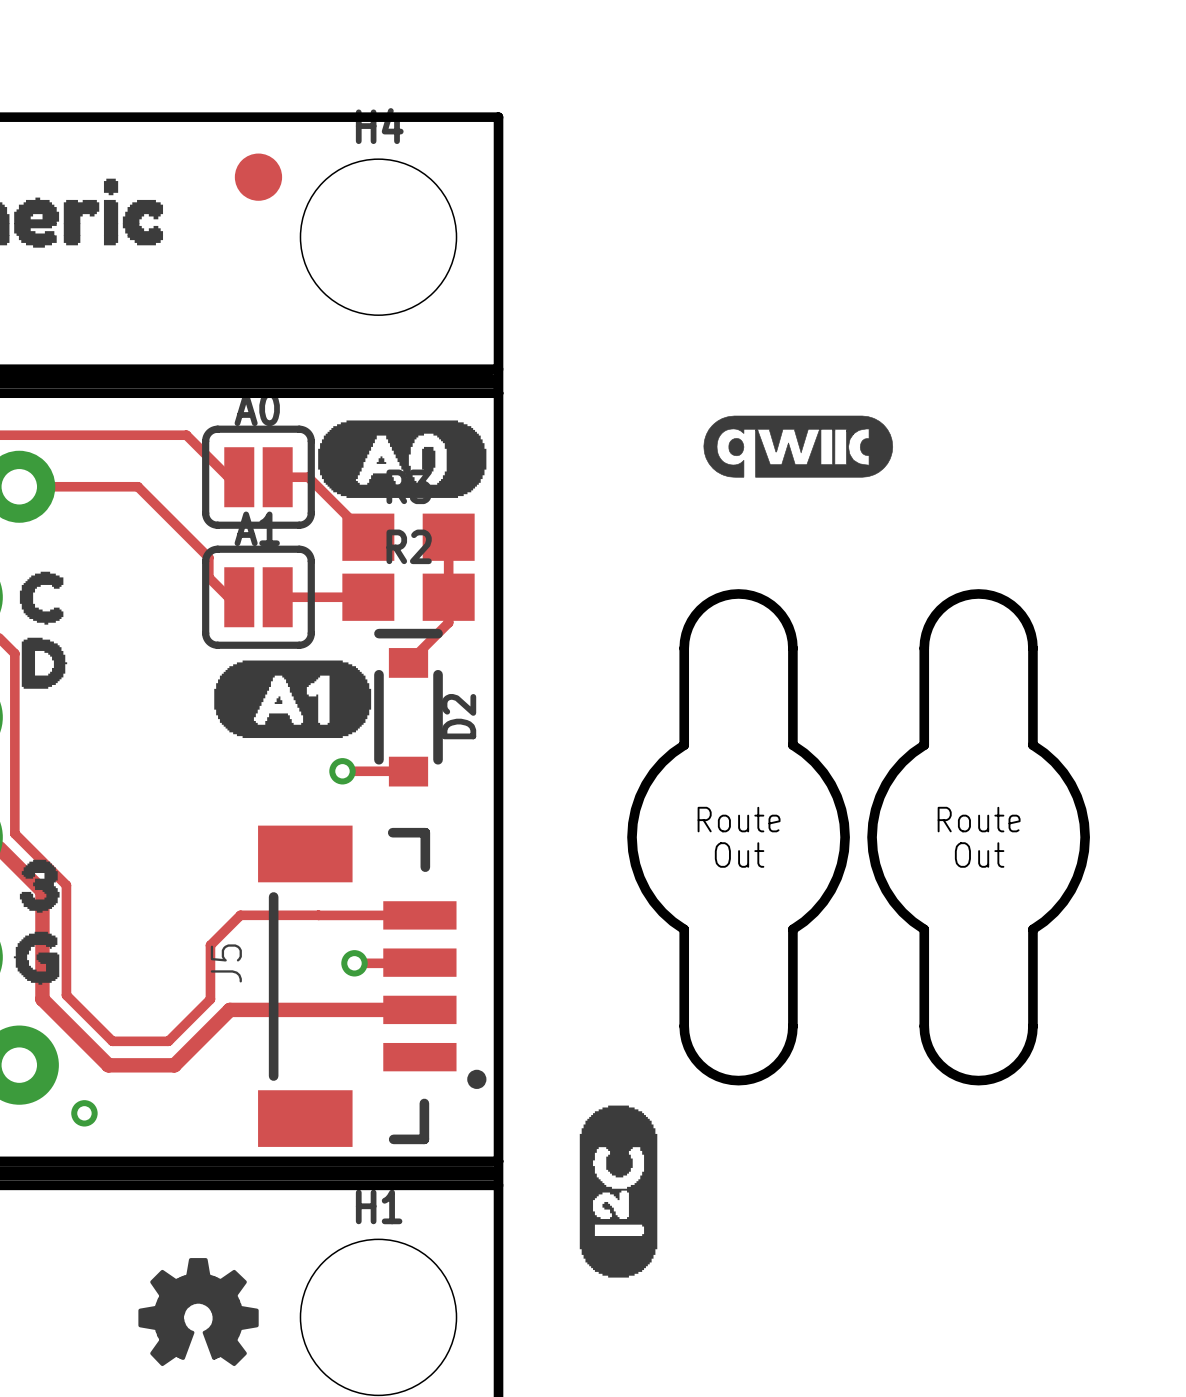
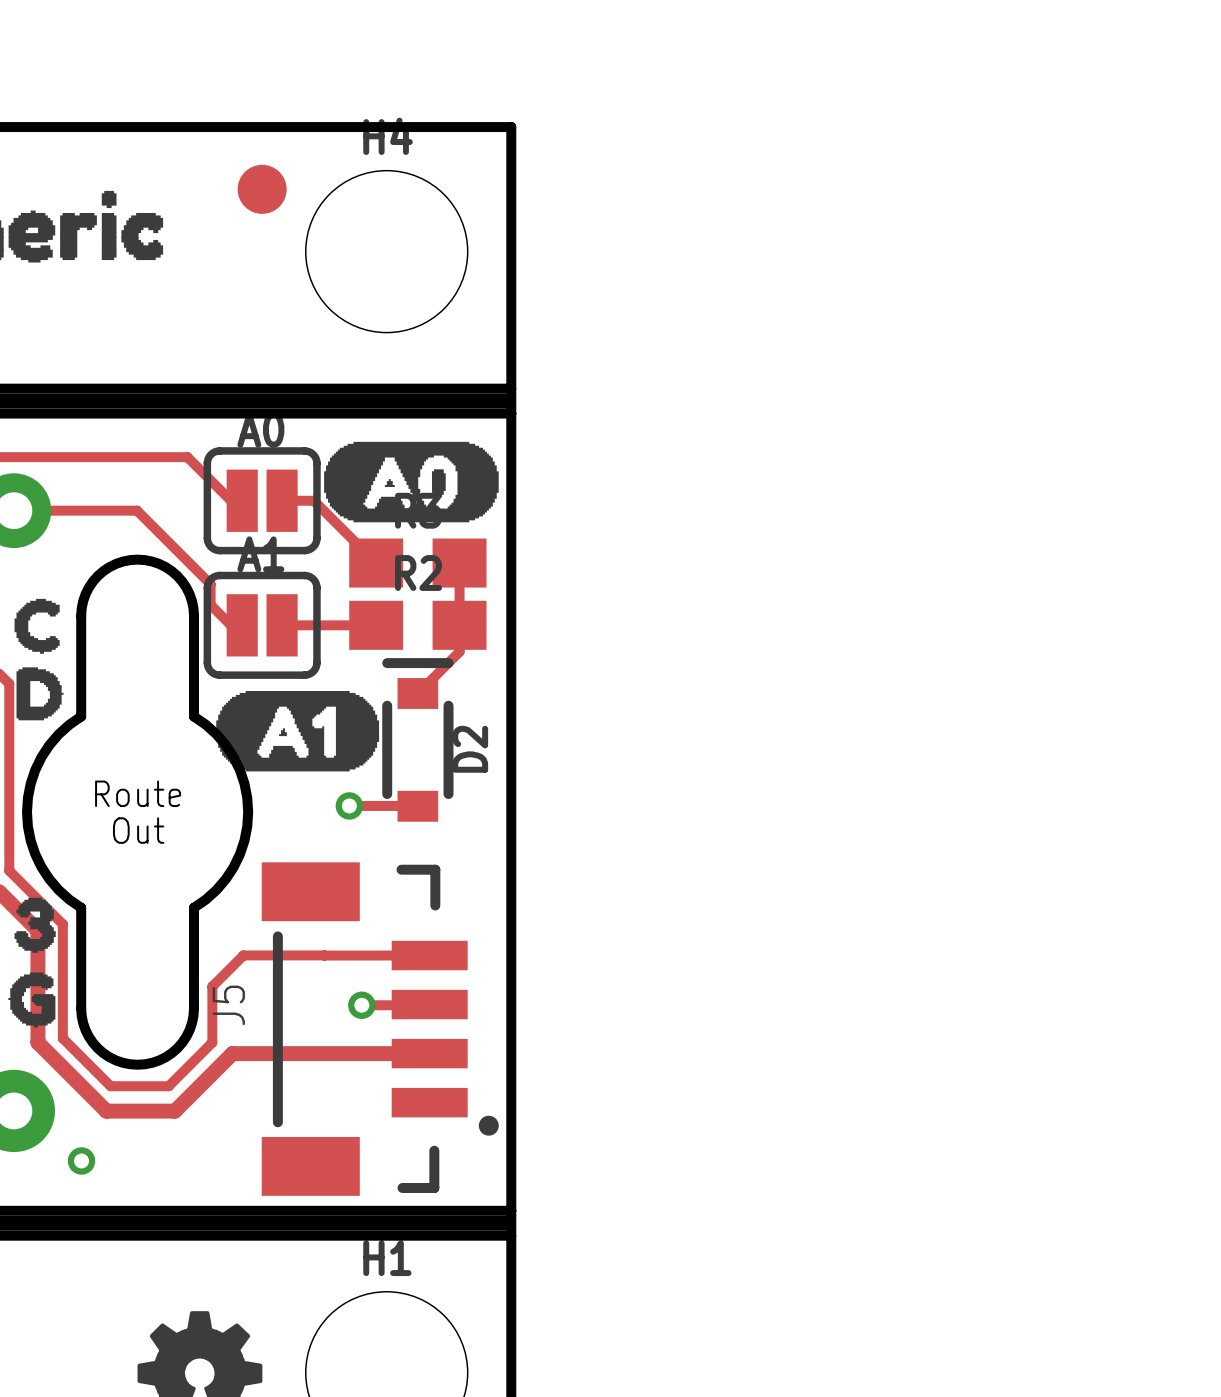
drawing: [703, 415, 894, 478] -> none
drawing: none -> [22, 554, 254, 1070]
drawing: [579, 589, 1090, 1278] -> none

